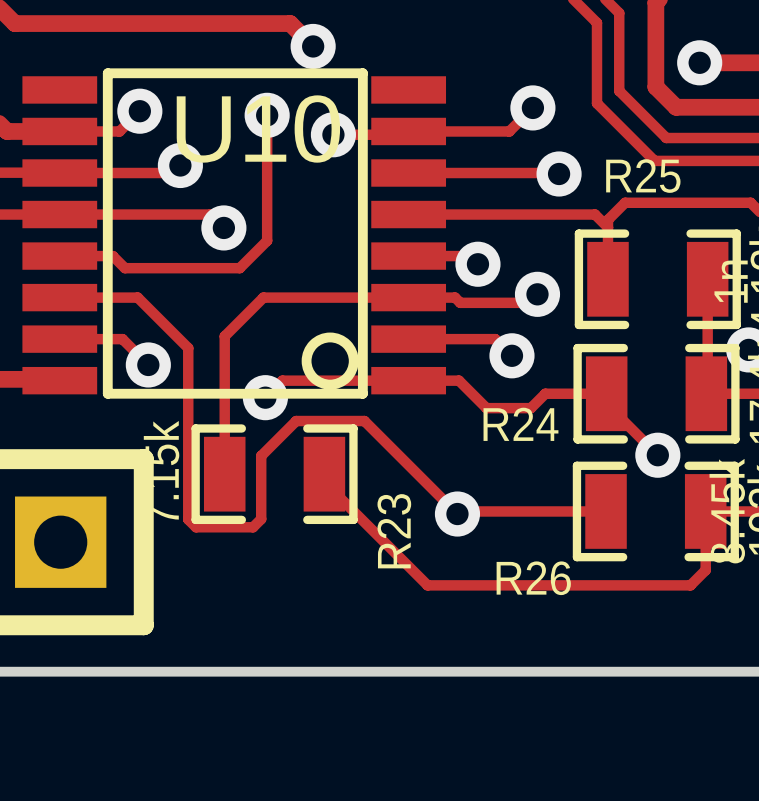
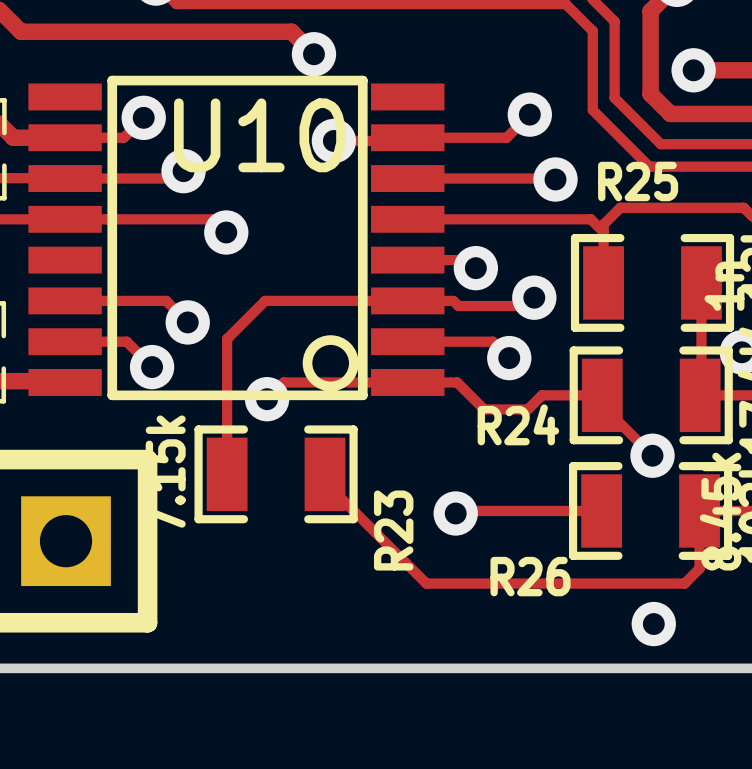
track: (267, 115) (267, 240) (239, 268) (124, 268) (112, 256) (59, 256) -> none
via position: (267, 115) -> (187, 322)
track: (137, 297) (188, 348) (188, 519) (196, 527) (253, 527) (261, 519) (261, 455) (296, 421) (364, 421) (457, 514) (460, 511) (465, 511) -> (141, 300) (166, 300) (187, 322)
via: none -> (653, 624)

